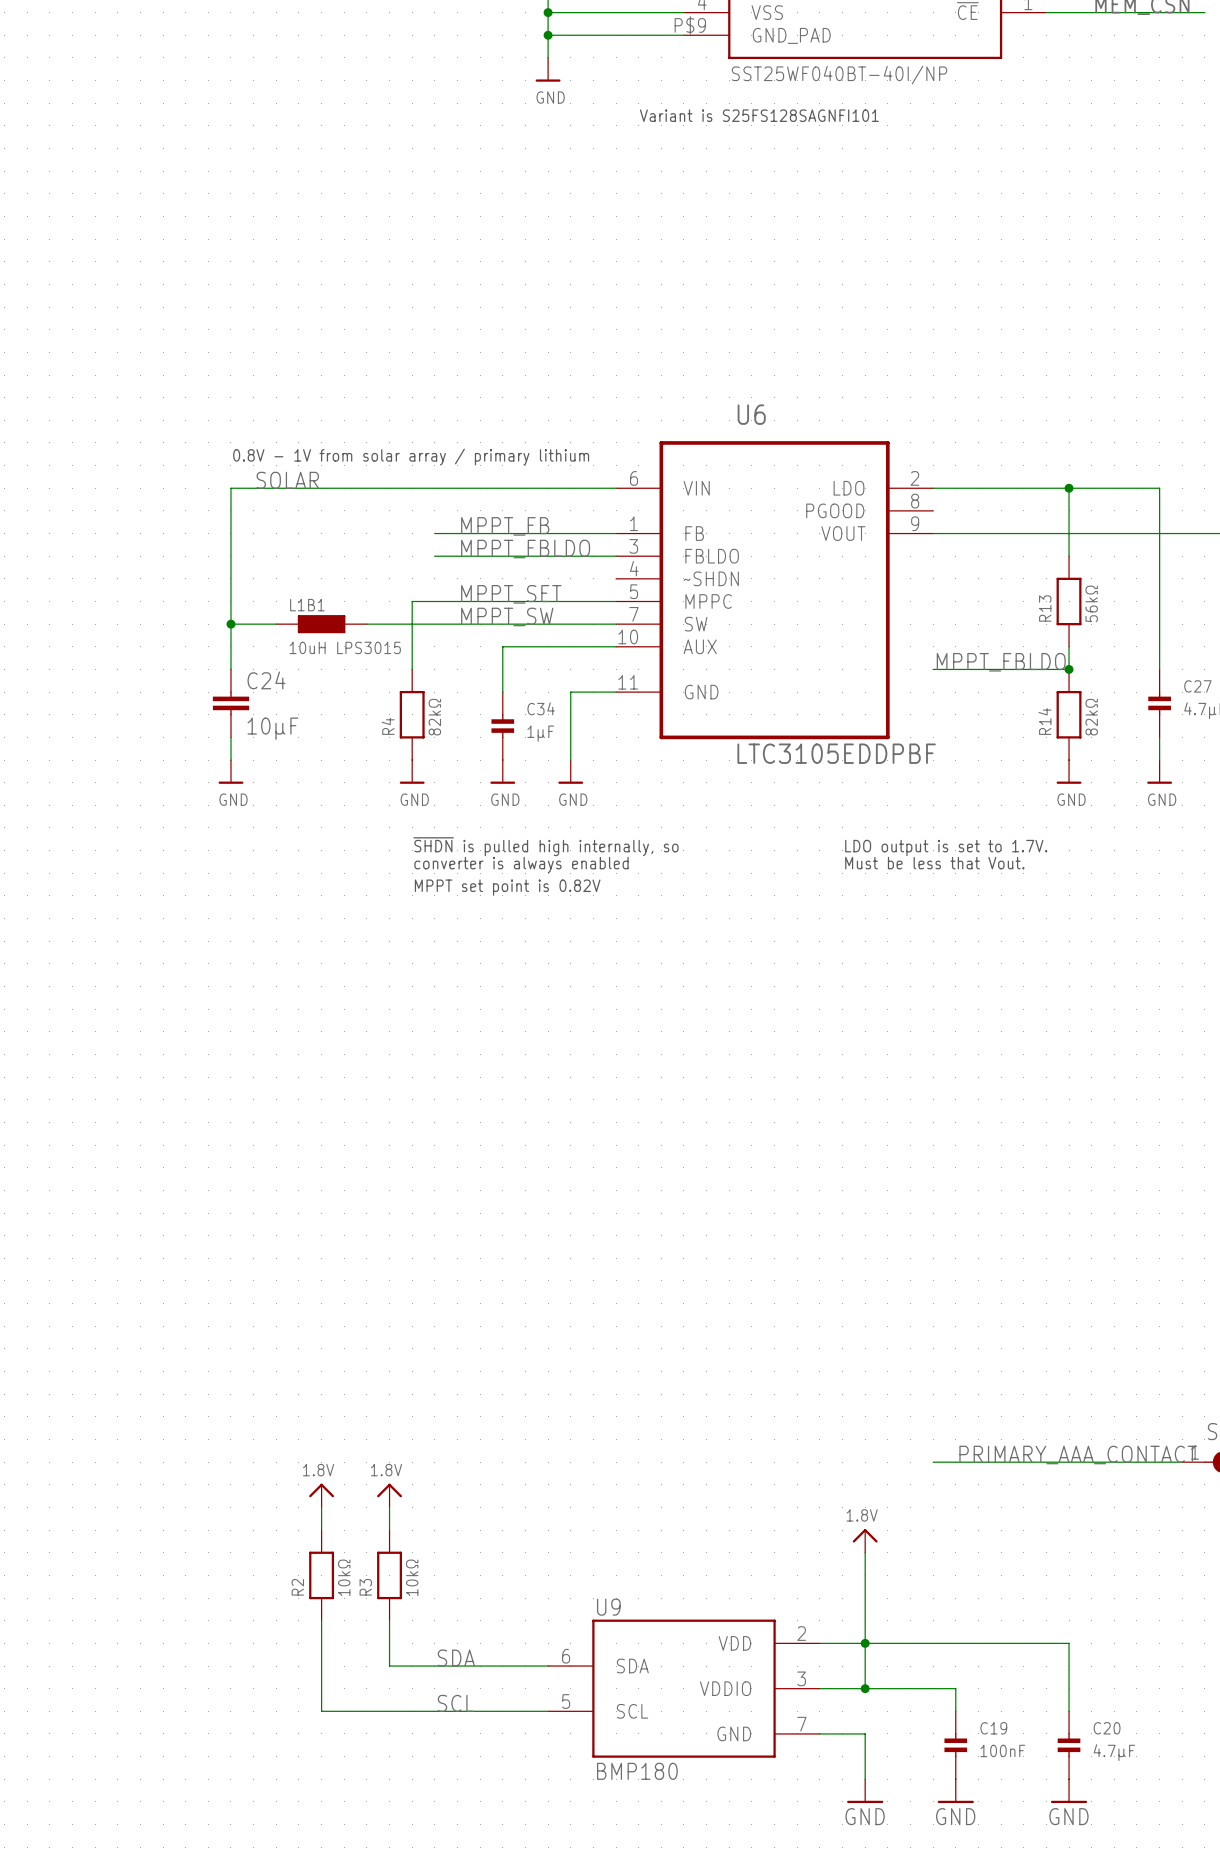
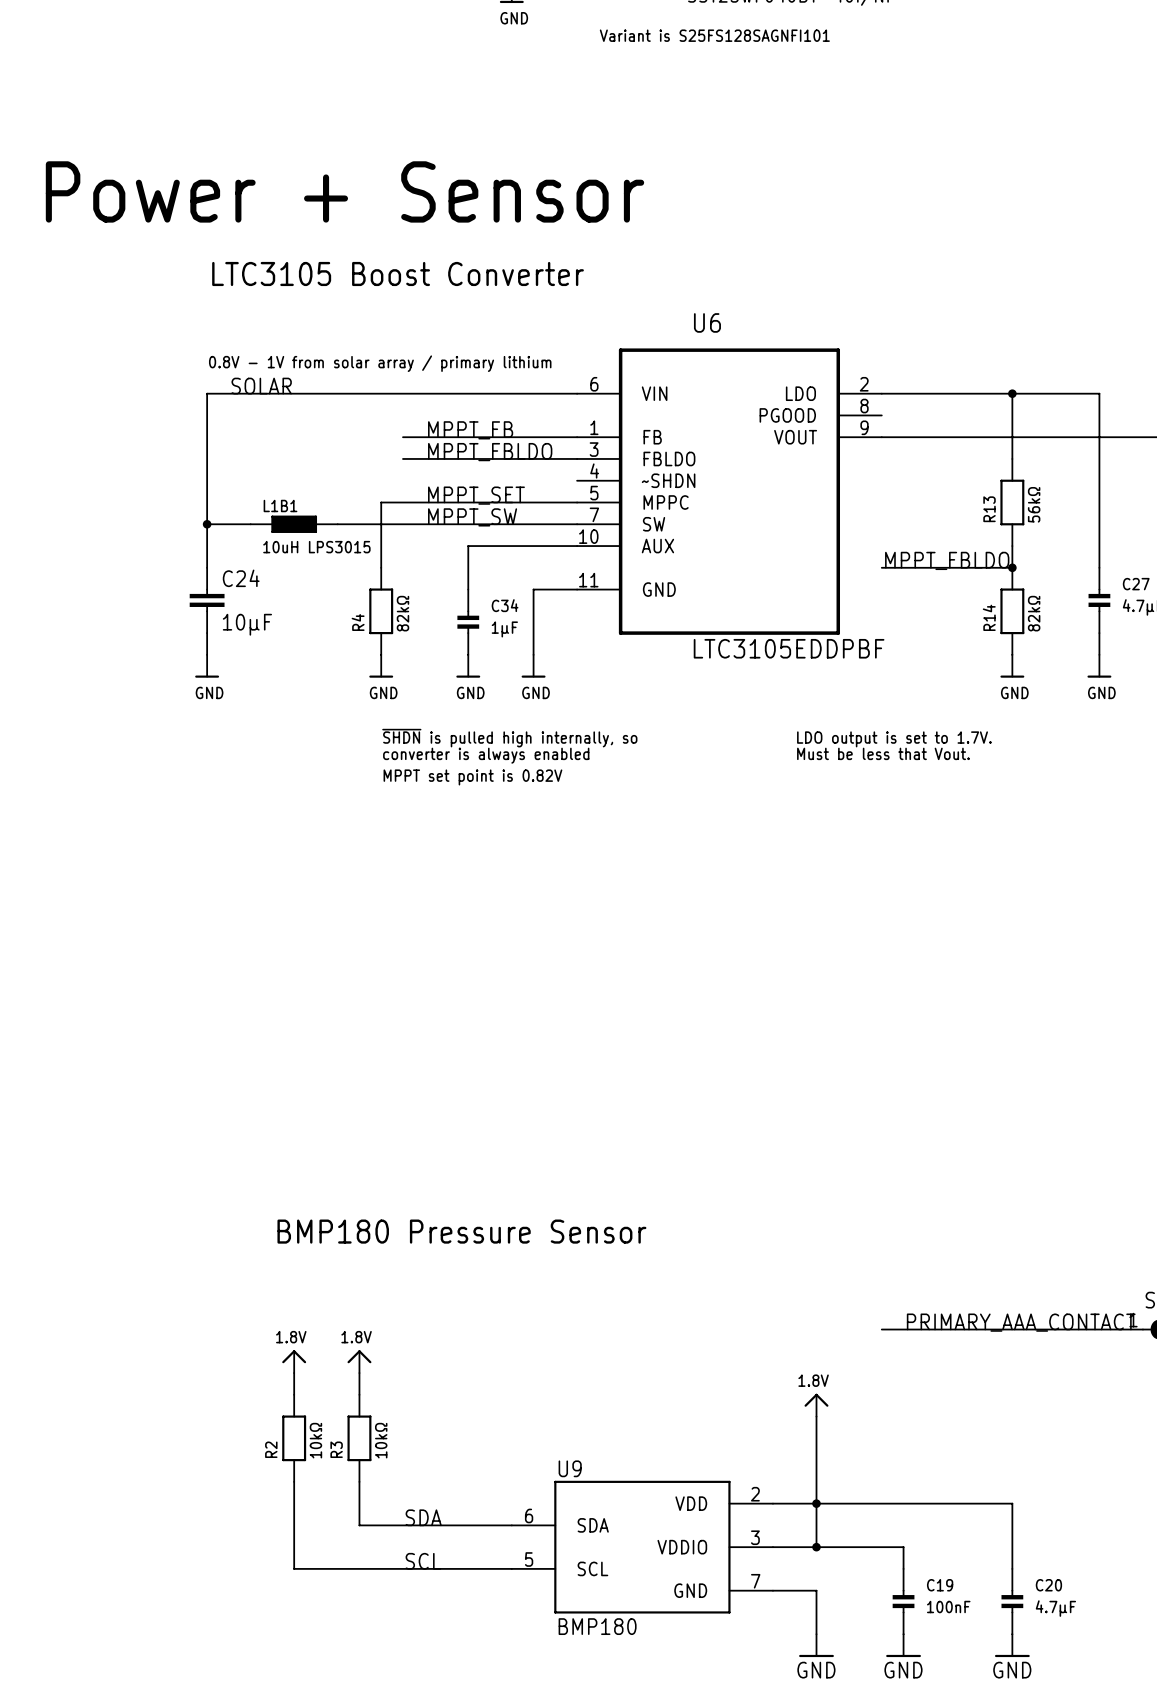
text: none -> Power + Sensor (344, 191)
text: none -> LTC3105 Boost Converter (398, 273)
text: none -> BMP180 Pressure Sensor (461, 1231)

